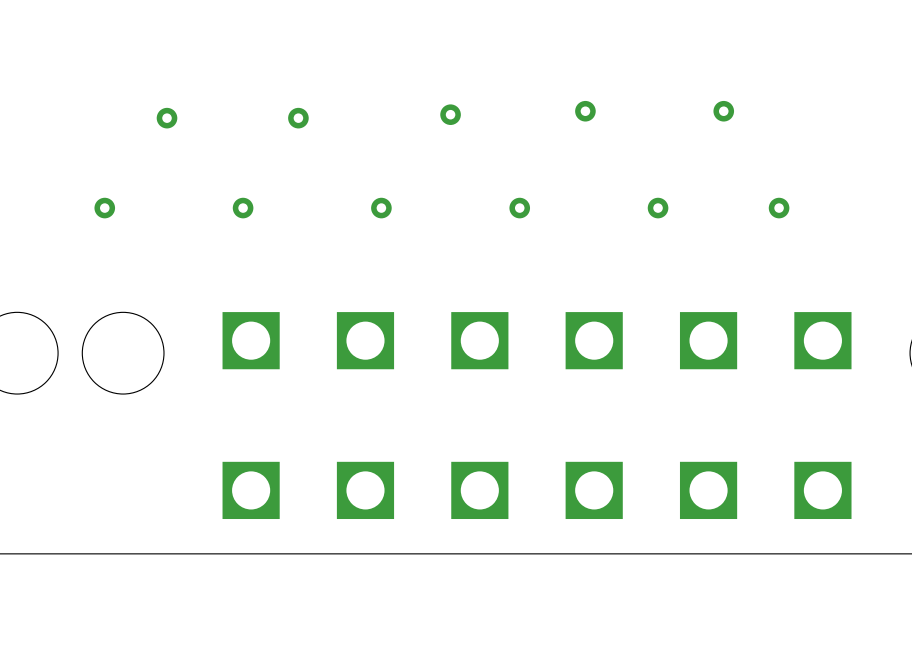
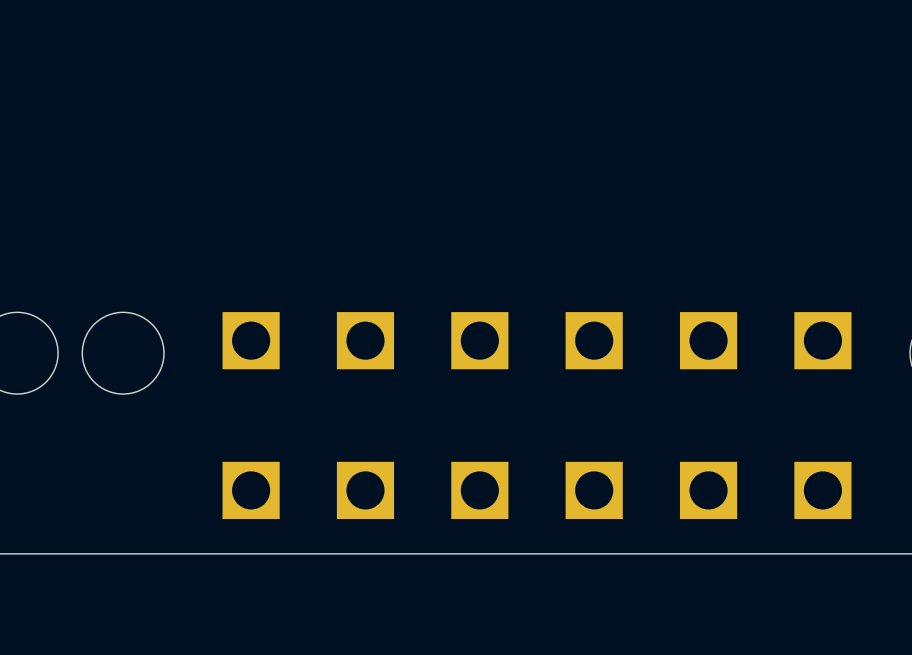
via: (585, 111) -> none
via: (723, 111) -> none
via: (450, 114) -> none
via: (167, 118) -> none
via: (298, 118) -> none
via: (104, 208) -> none
via: (243, 208) -> none
via: (381, 208) -> none
via: (519, 208) -> none
via: (658, 208) -> none
via: (779, 208) -> none

